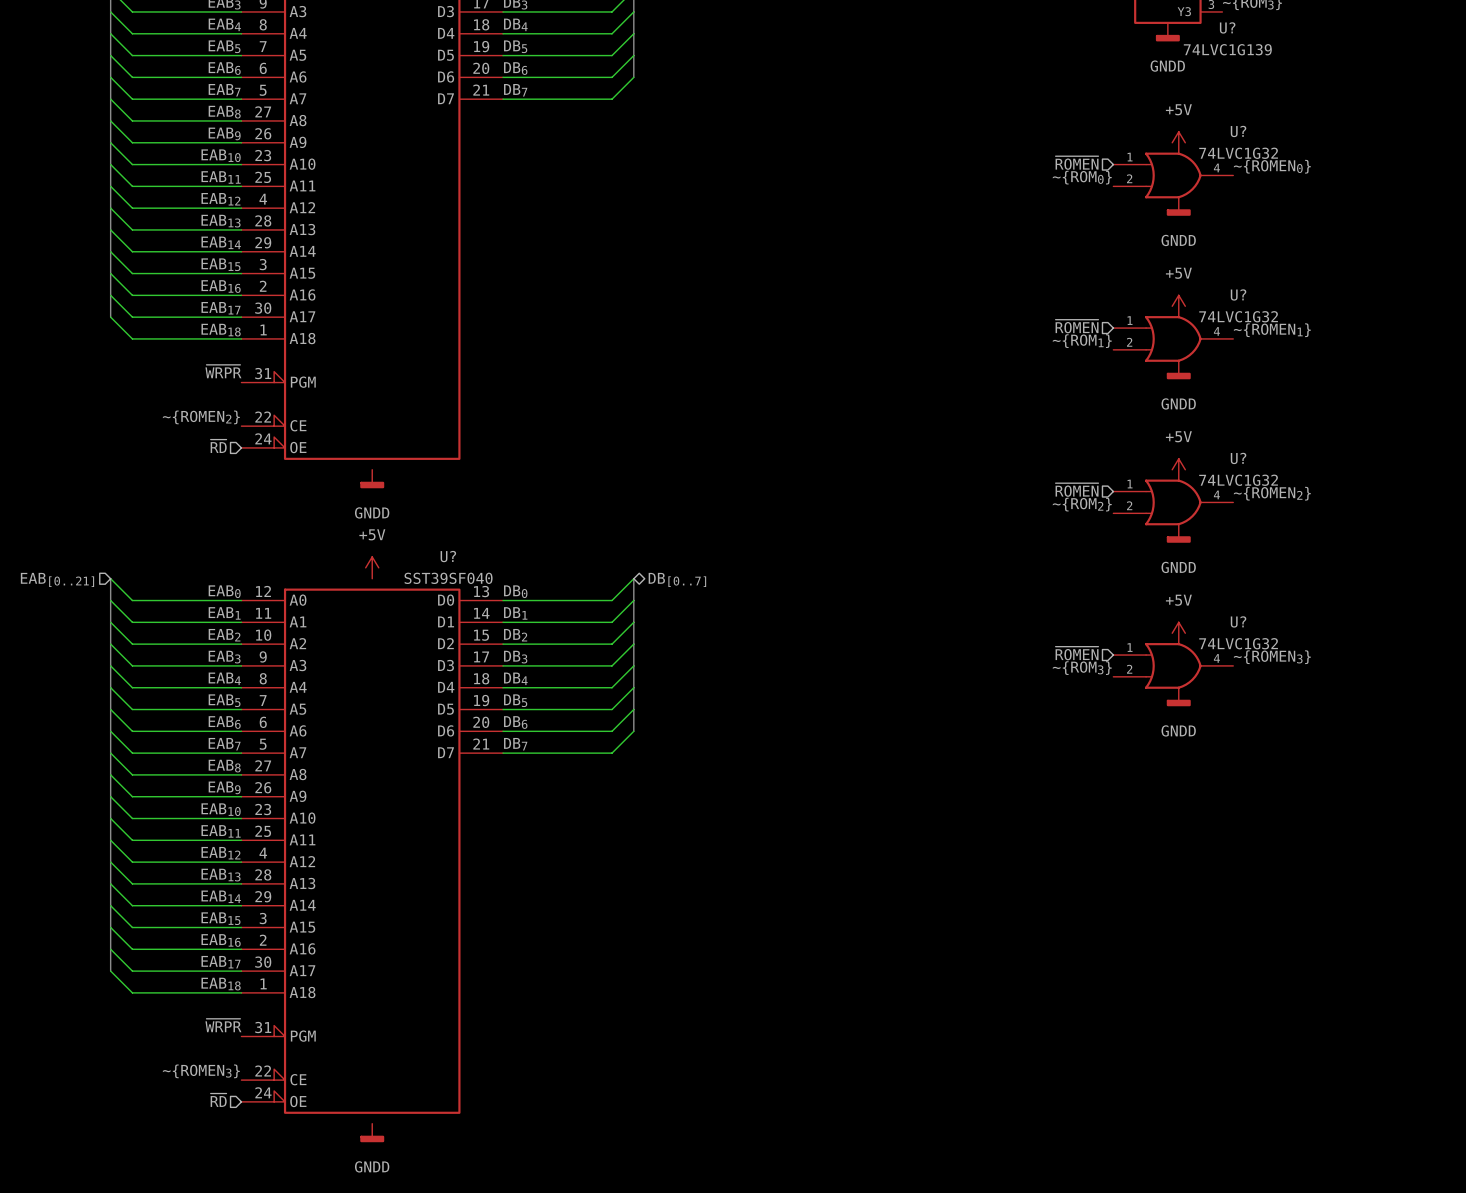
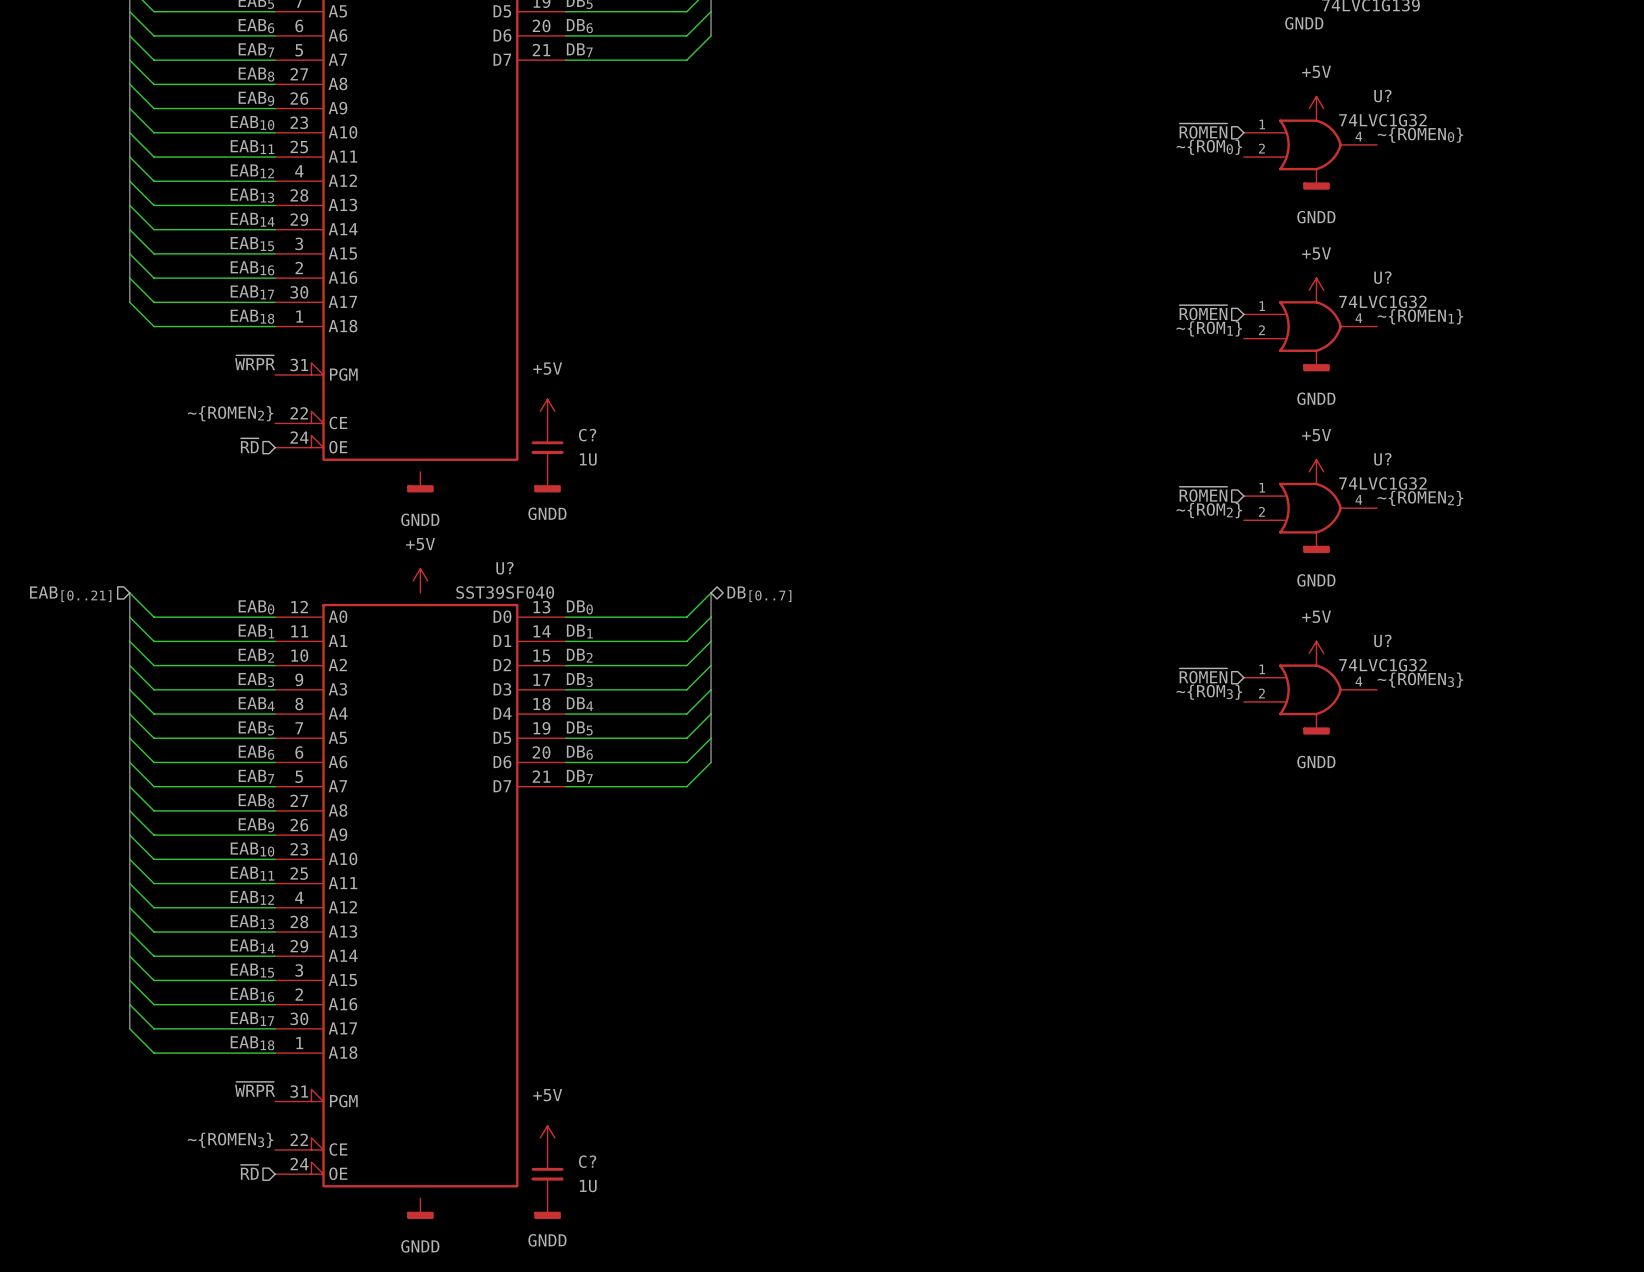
power symbol: none -> +5V (547, 411)
C?: none -> 1U (547, 447)
power symbol: none -> GNDD (547, 482)
power symbol: none -> +5V (547, 1137)
C?: none -> 1U (547, 1174)
power symbol: none -> GNDD (547, 1208)

